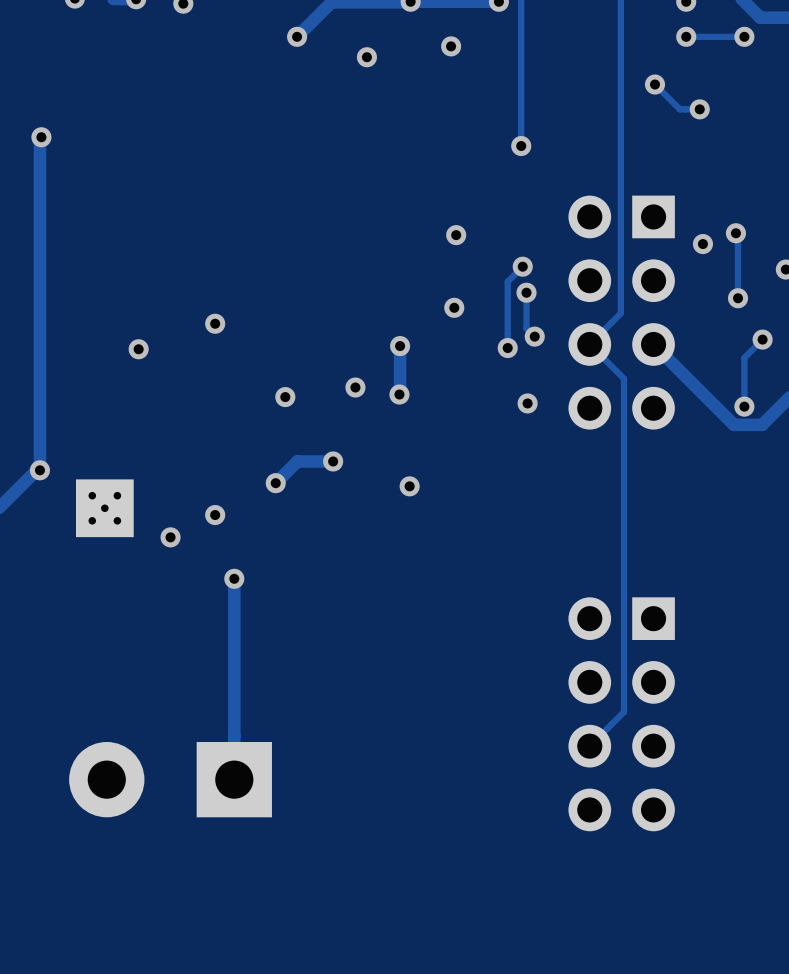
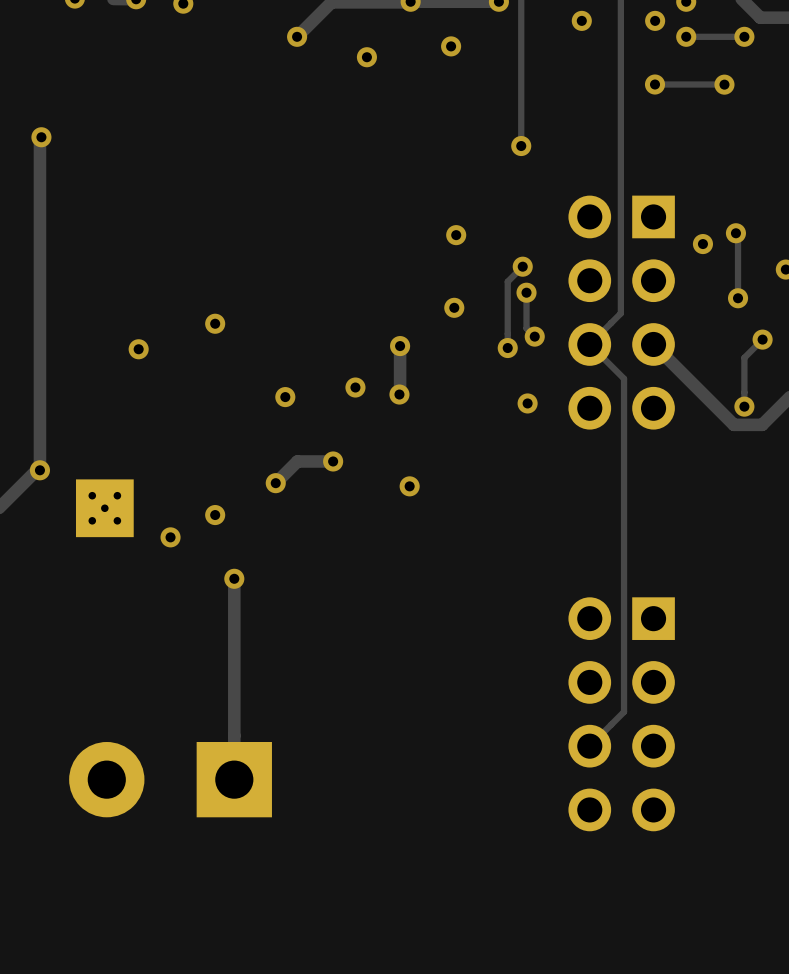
via: none -> (581, 20)
via: none -> (655, 20)
track: (655, 84) (679, 109) (699, 109) -> (655, 84) (724, 84)
via position: (699, 109) -> (724, 84)

